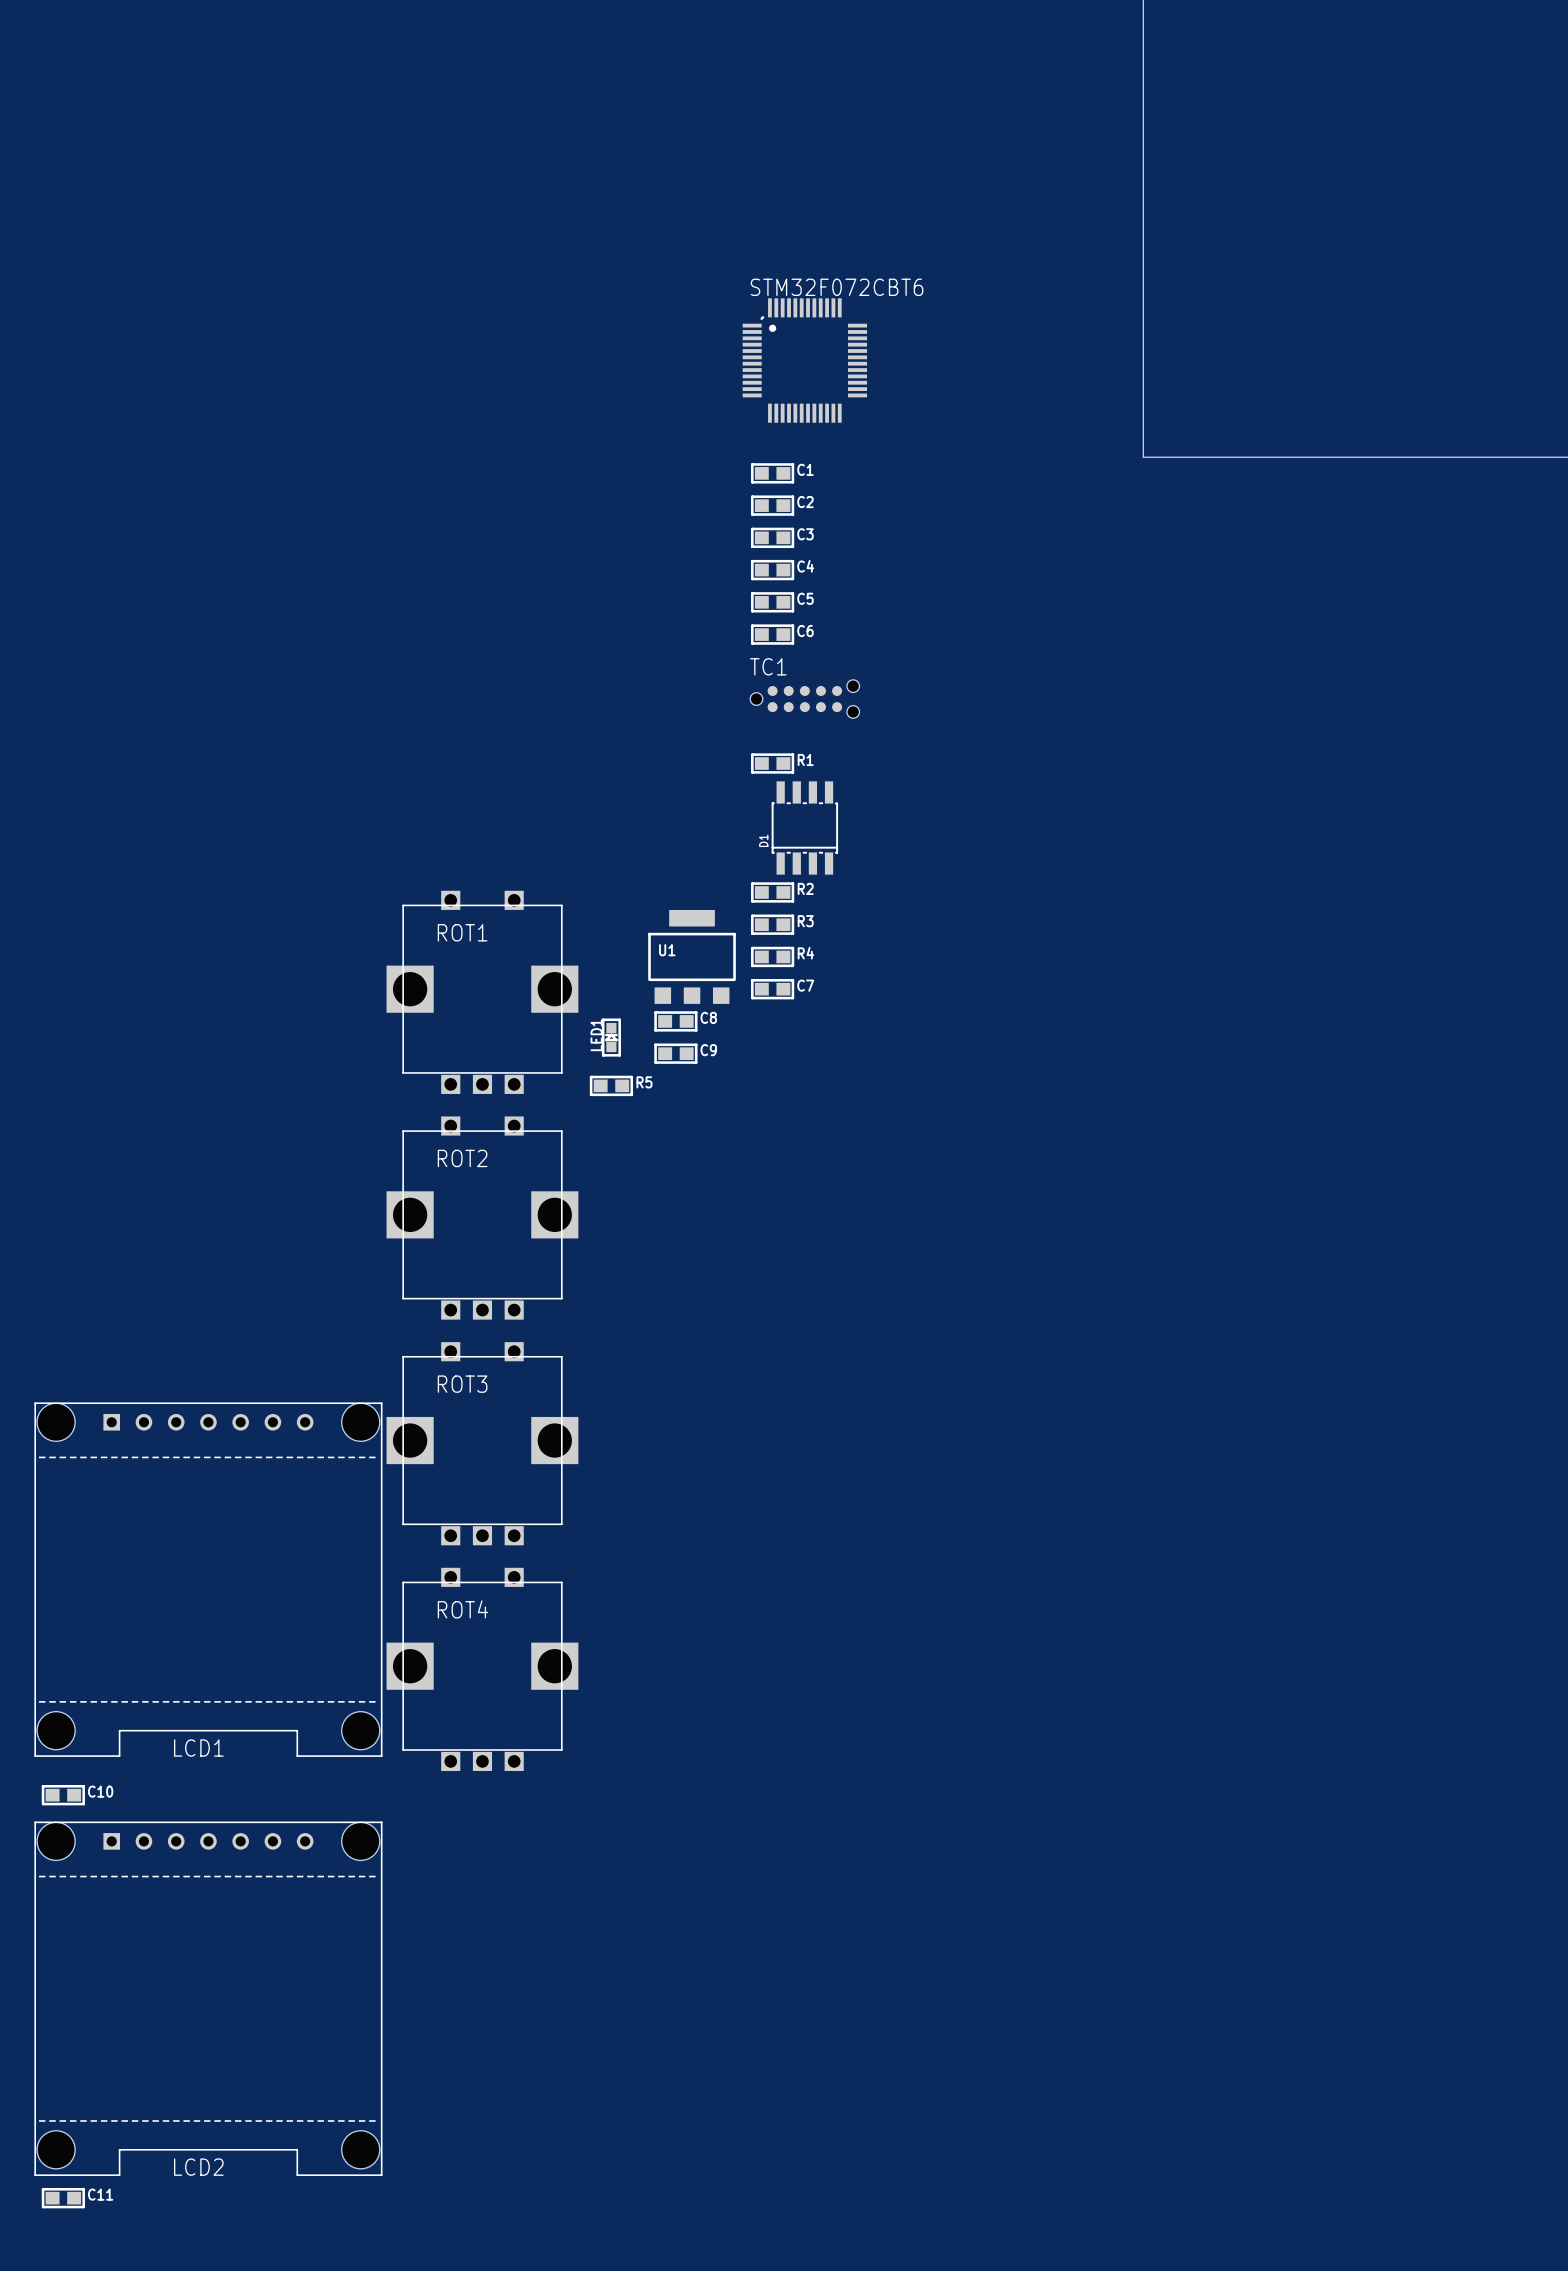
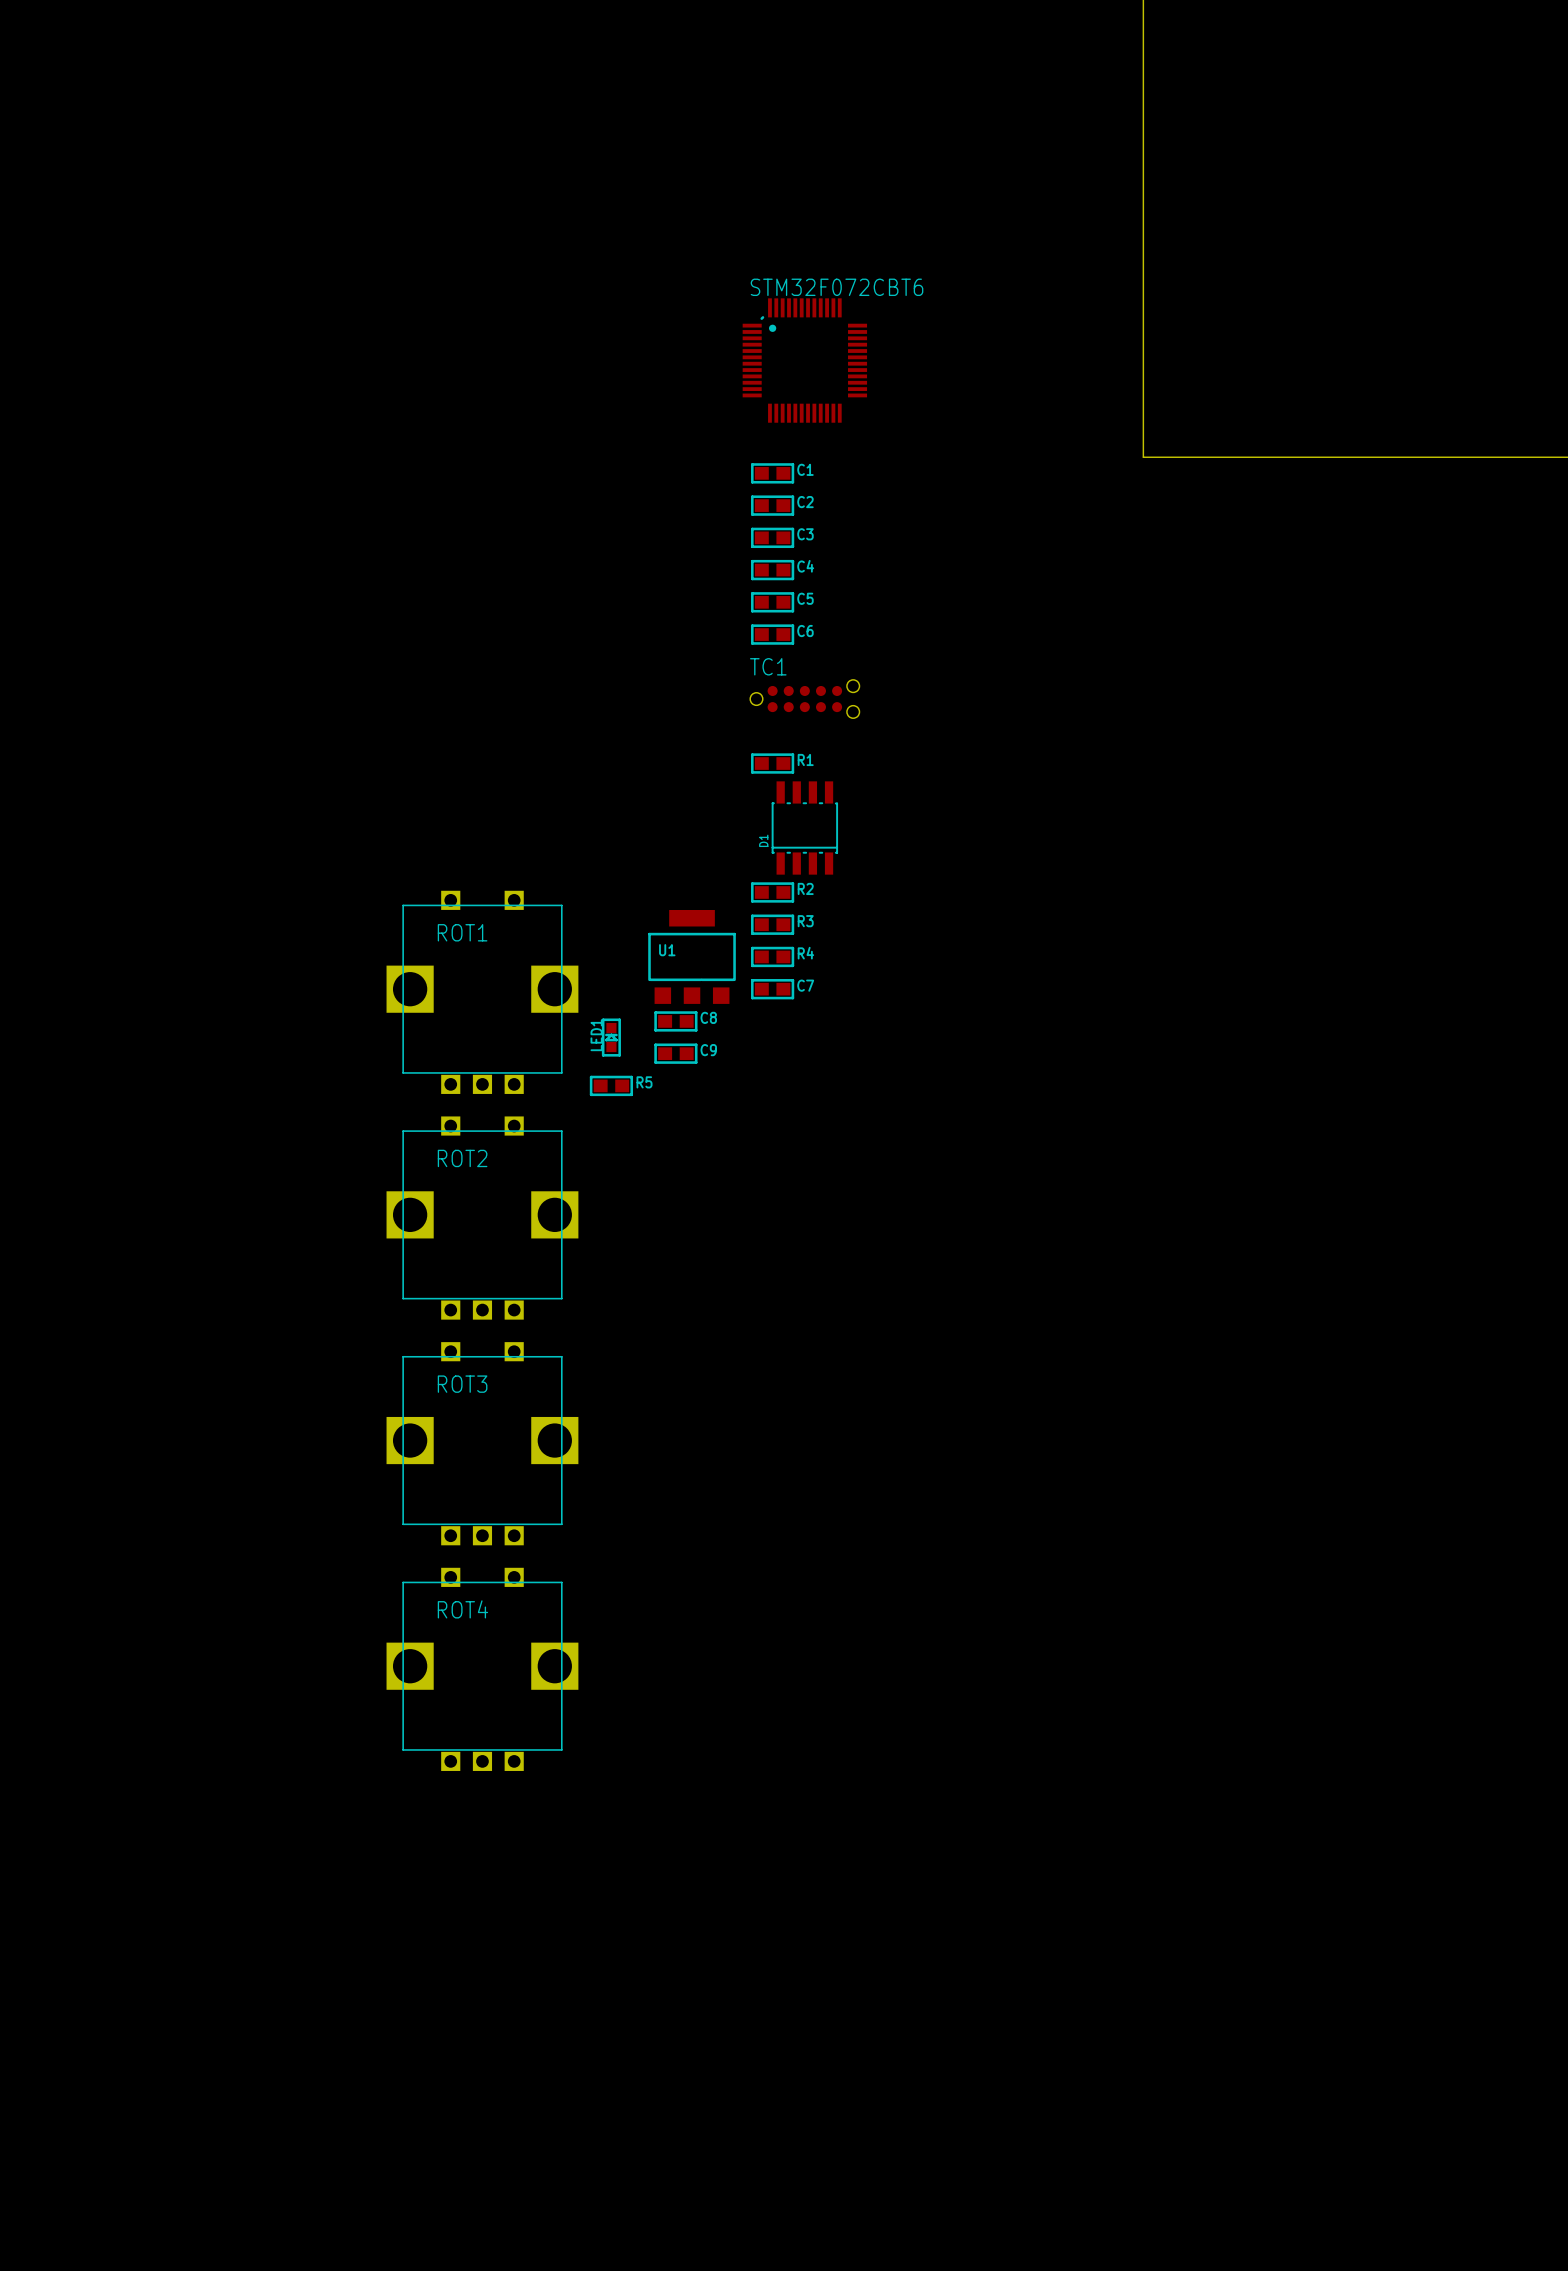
LCD1: (208, 1579) -> none
C10: (63, 1795) -> none
LCD2: (208, 1998) -> none
C11: (63, 2198) -> none

